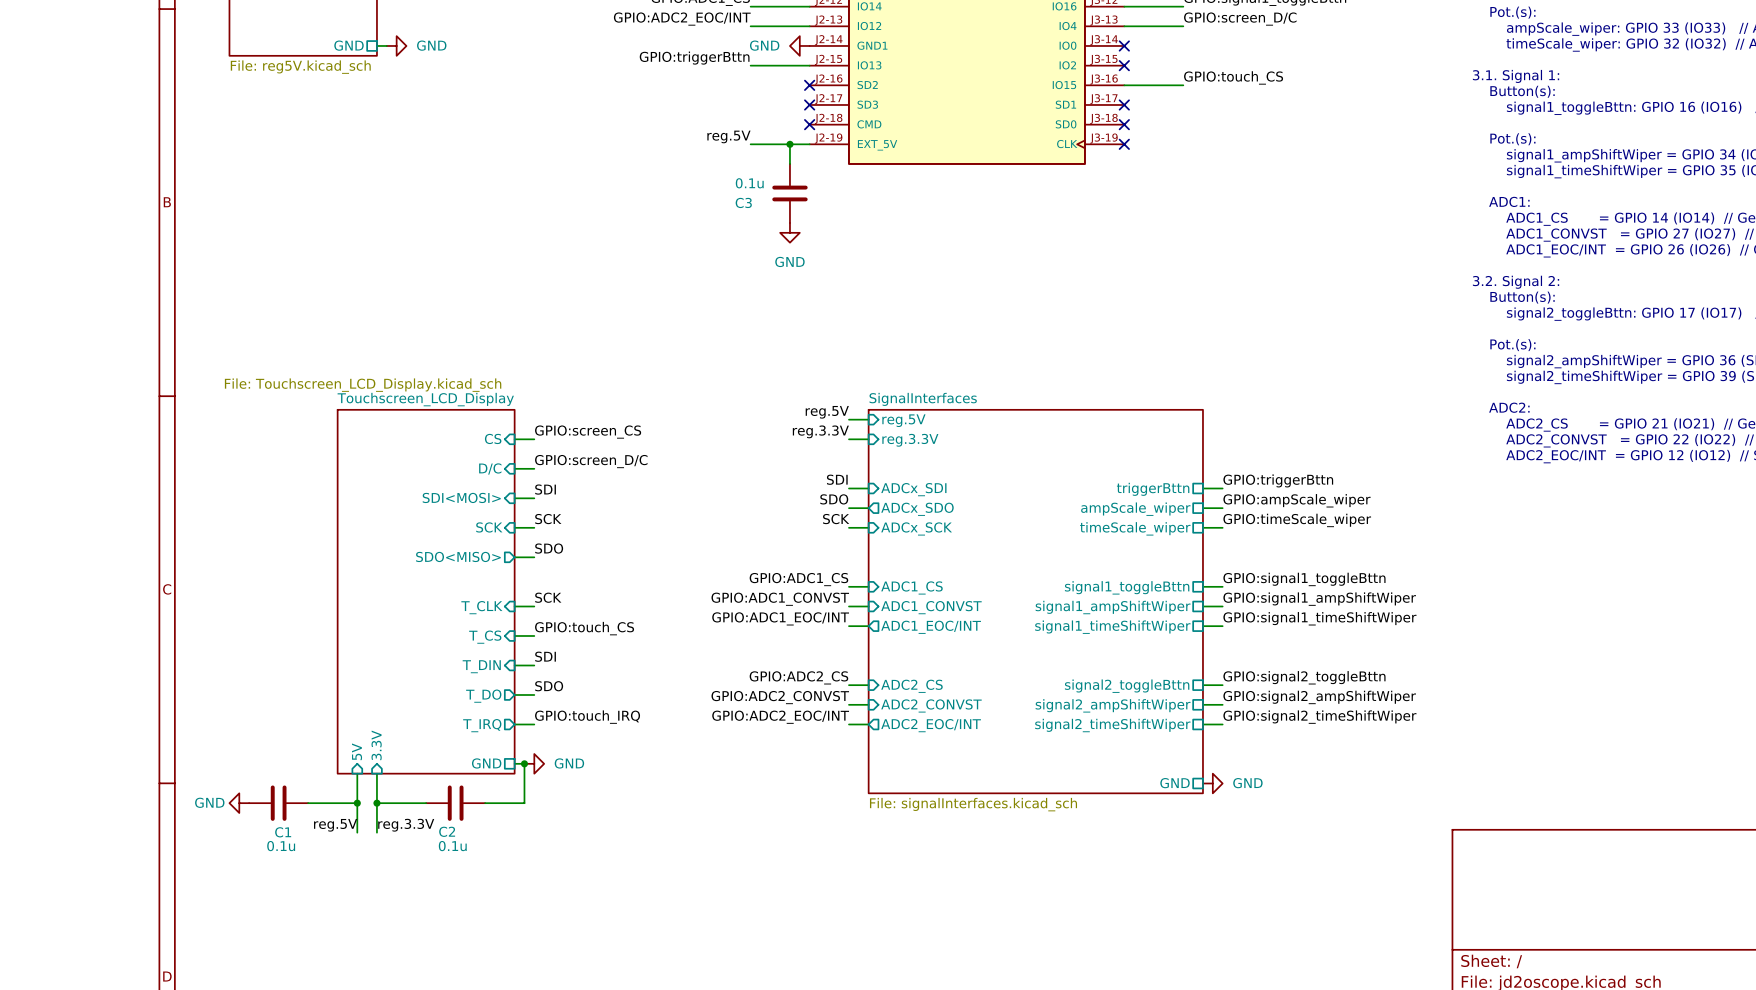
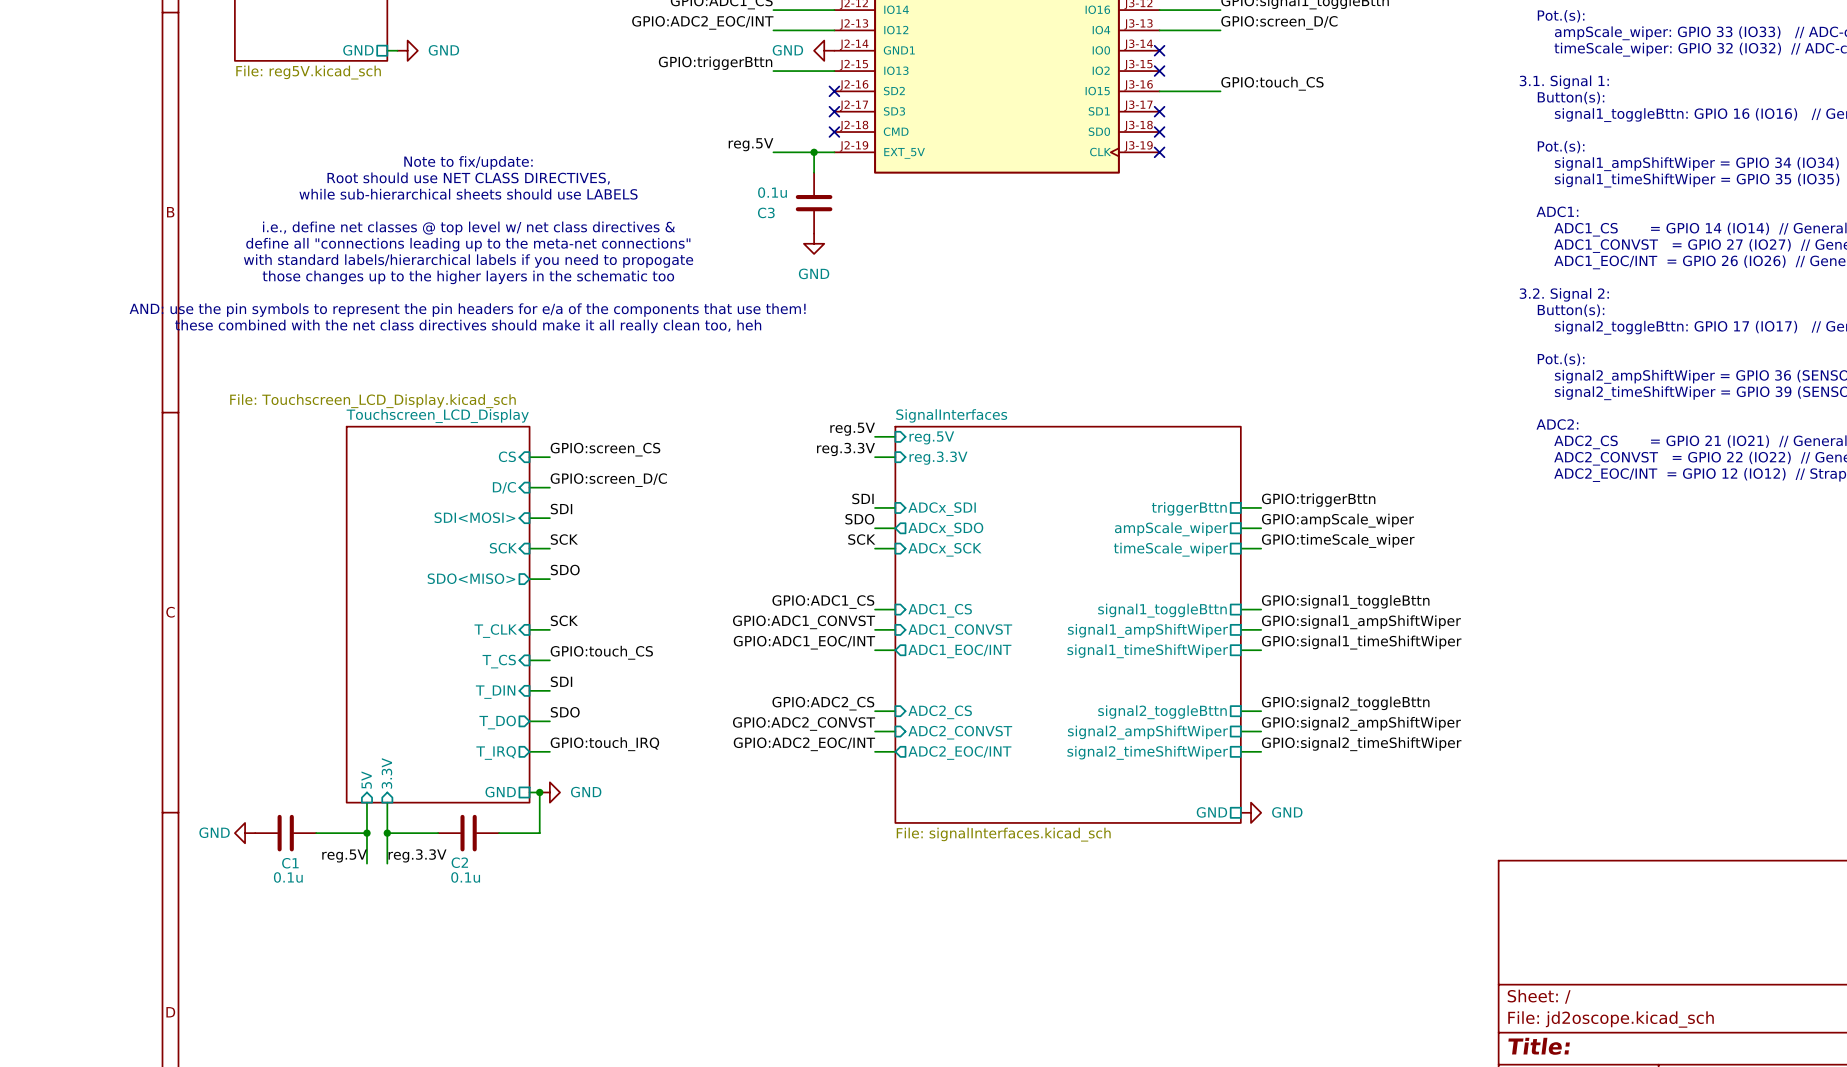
text: none -> Note to fix/update: (468, 162)
text: none -> Root should use NET CLASS DIRECTIVES, (468, 178)
text: none -> while sub-hierarchical sheets should use LABELS (468, 194)
text: none -> i.e., define net classes @ top level w/ net class directives & (469, 228)
text: none -> define all "connections leading up to the meta-net connections" (468, 244)
text: none -> with standard labels/hierarchical labels if you need to propogate (468, 261)
text: none -> those changes up to the higher layers in the schematic too (468, 277)
text: none -> AND: use the pin symbols to represent the pin headers for e/a of the components that use them! (467, 310)
text: none -> these combined with the net class directives should make it all really clean too, heh (468, 326)

